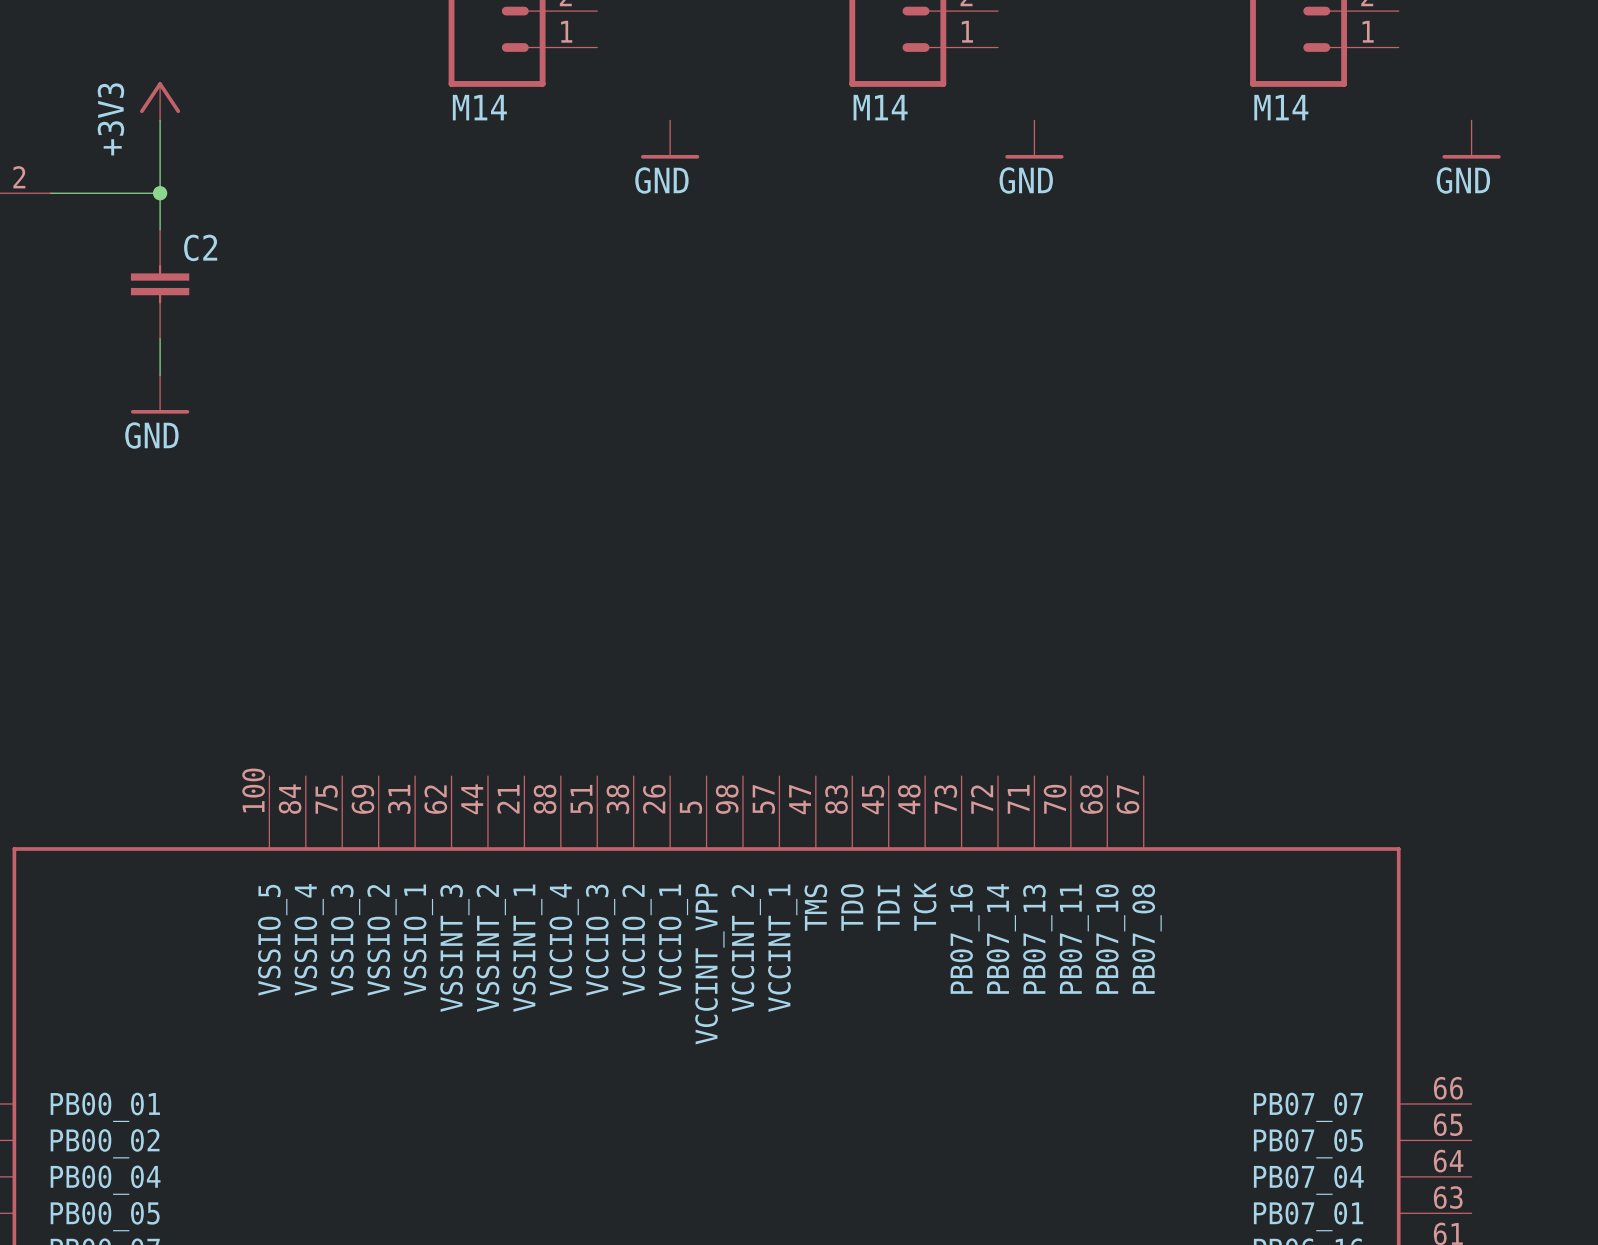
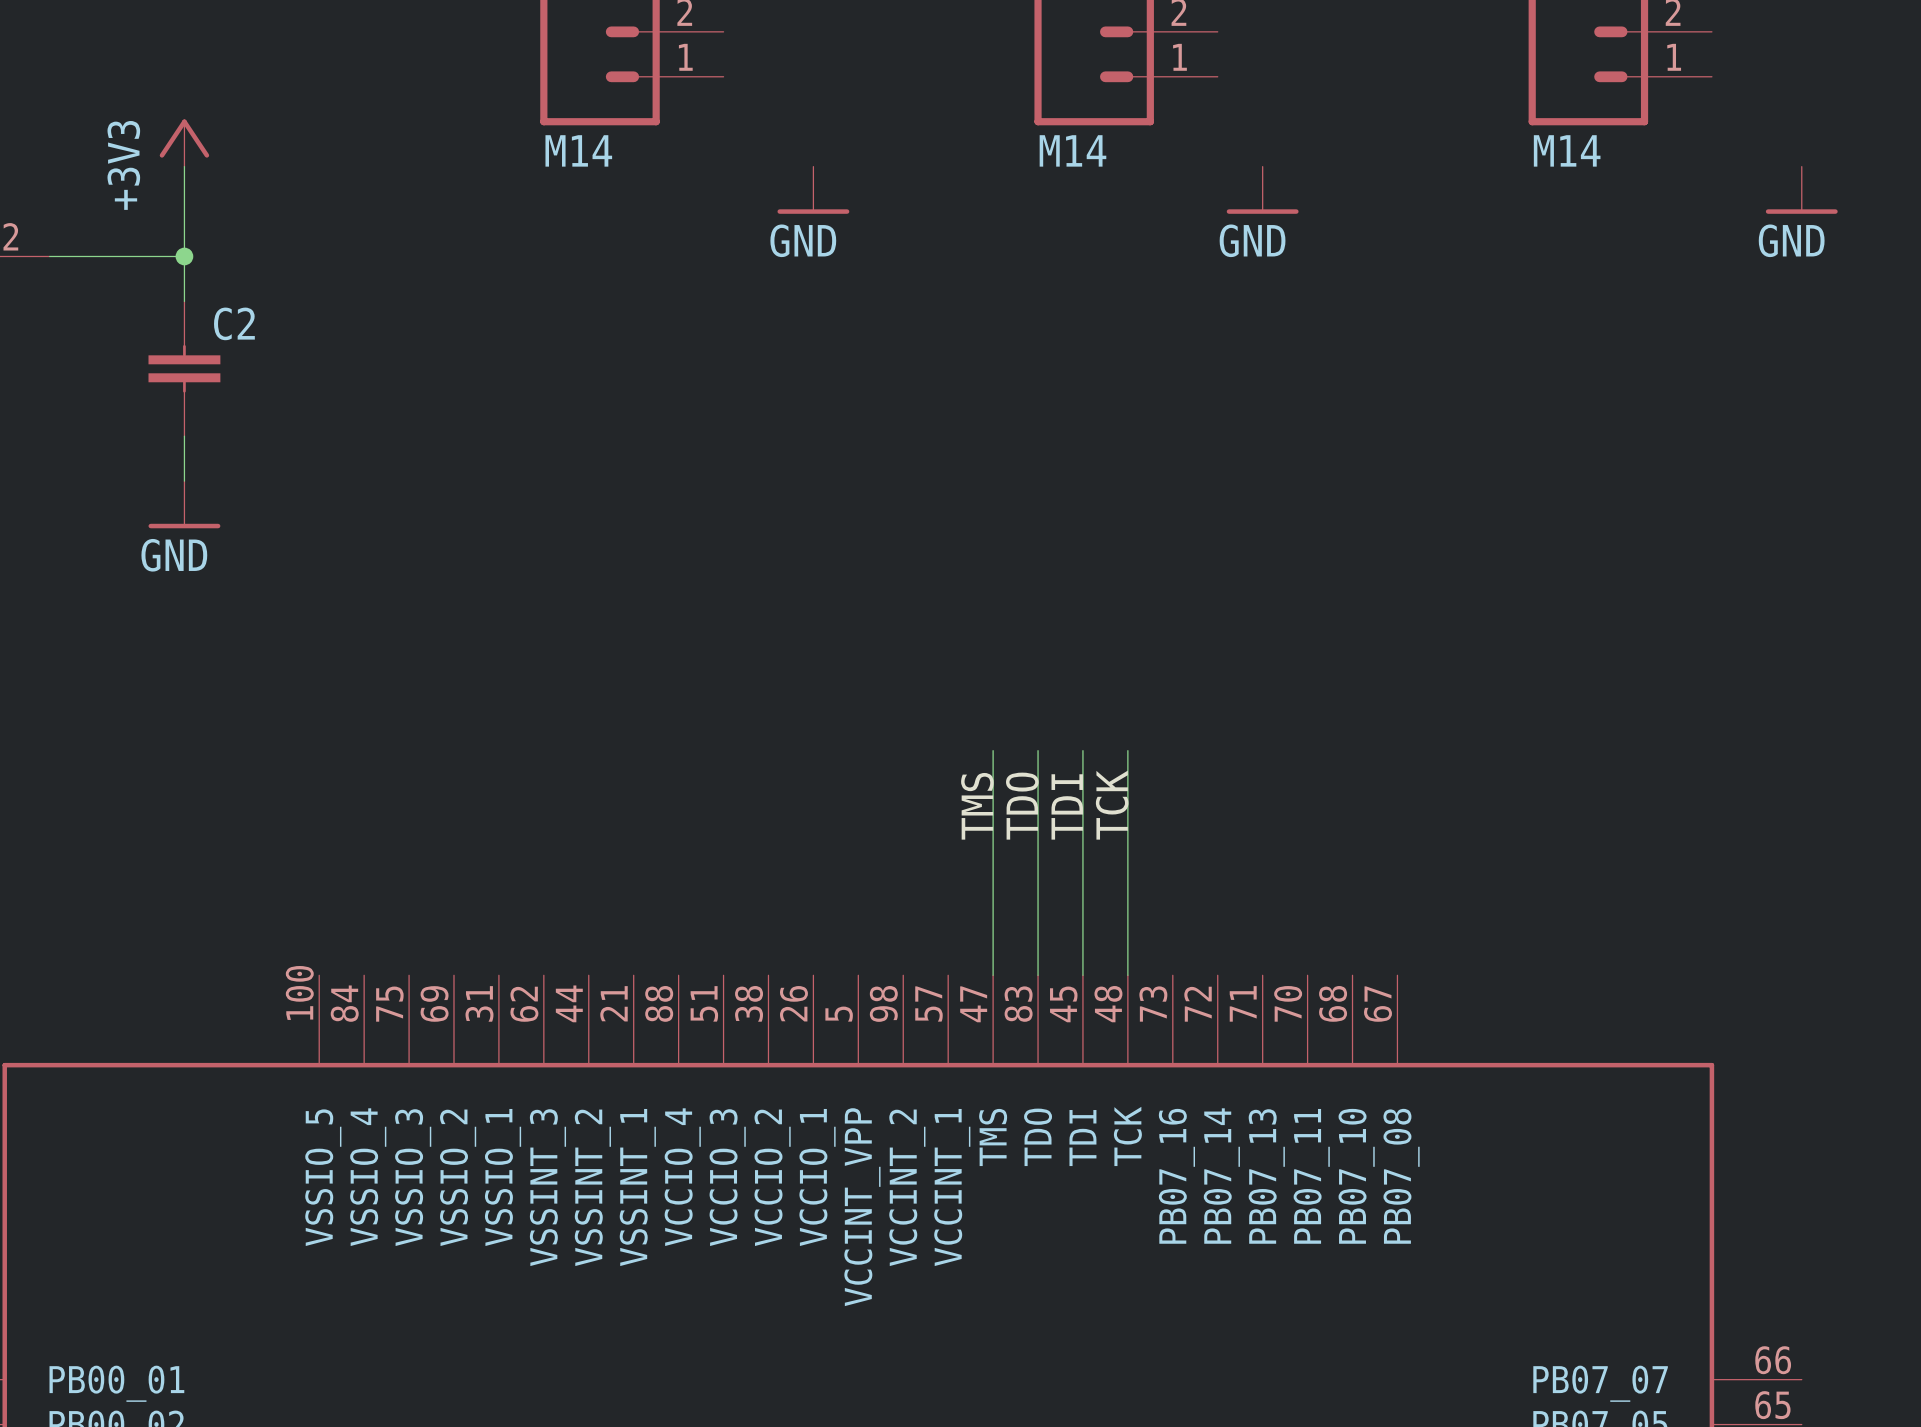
wire: none -> (993, 750) (993, 975)
wire: none -> (1038, 750) (1038, 975)
wire: none -> (1082, 750) (1082, 975)
wire: none -> (1127, 750) (1127, 975)
label: none -> TDO (1022, 806)
label: none -> TCK (1112, 805)
label: none -> TMS (977, 806)
label: none -> TDI (1067, 806)

